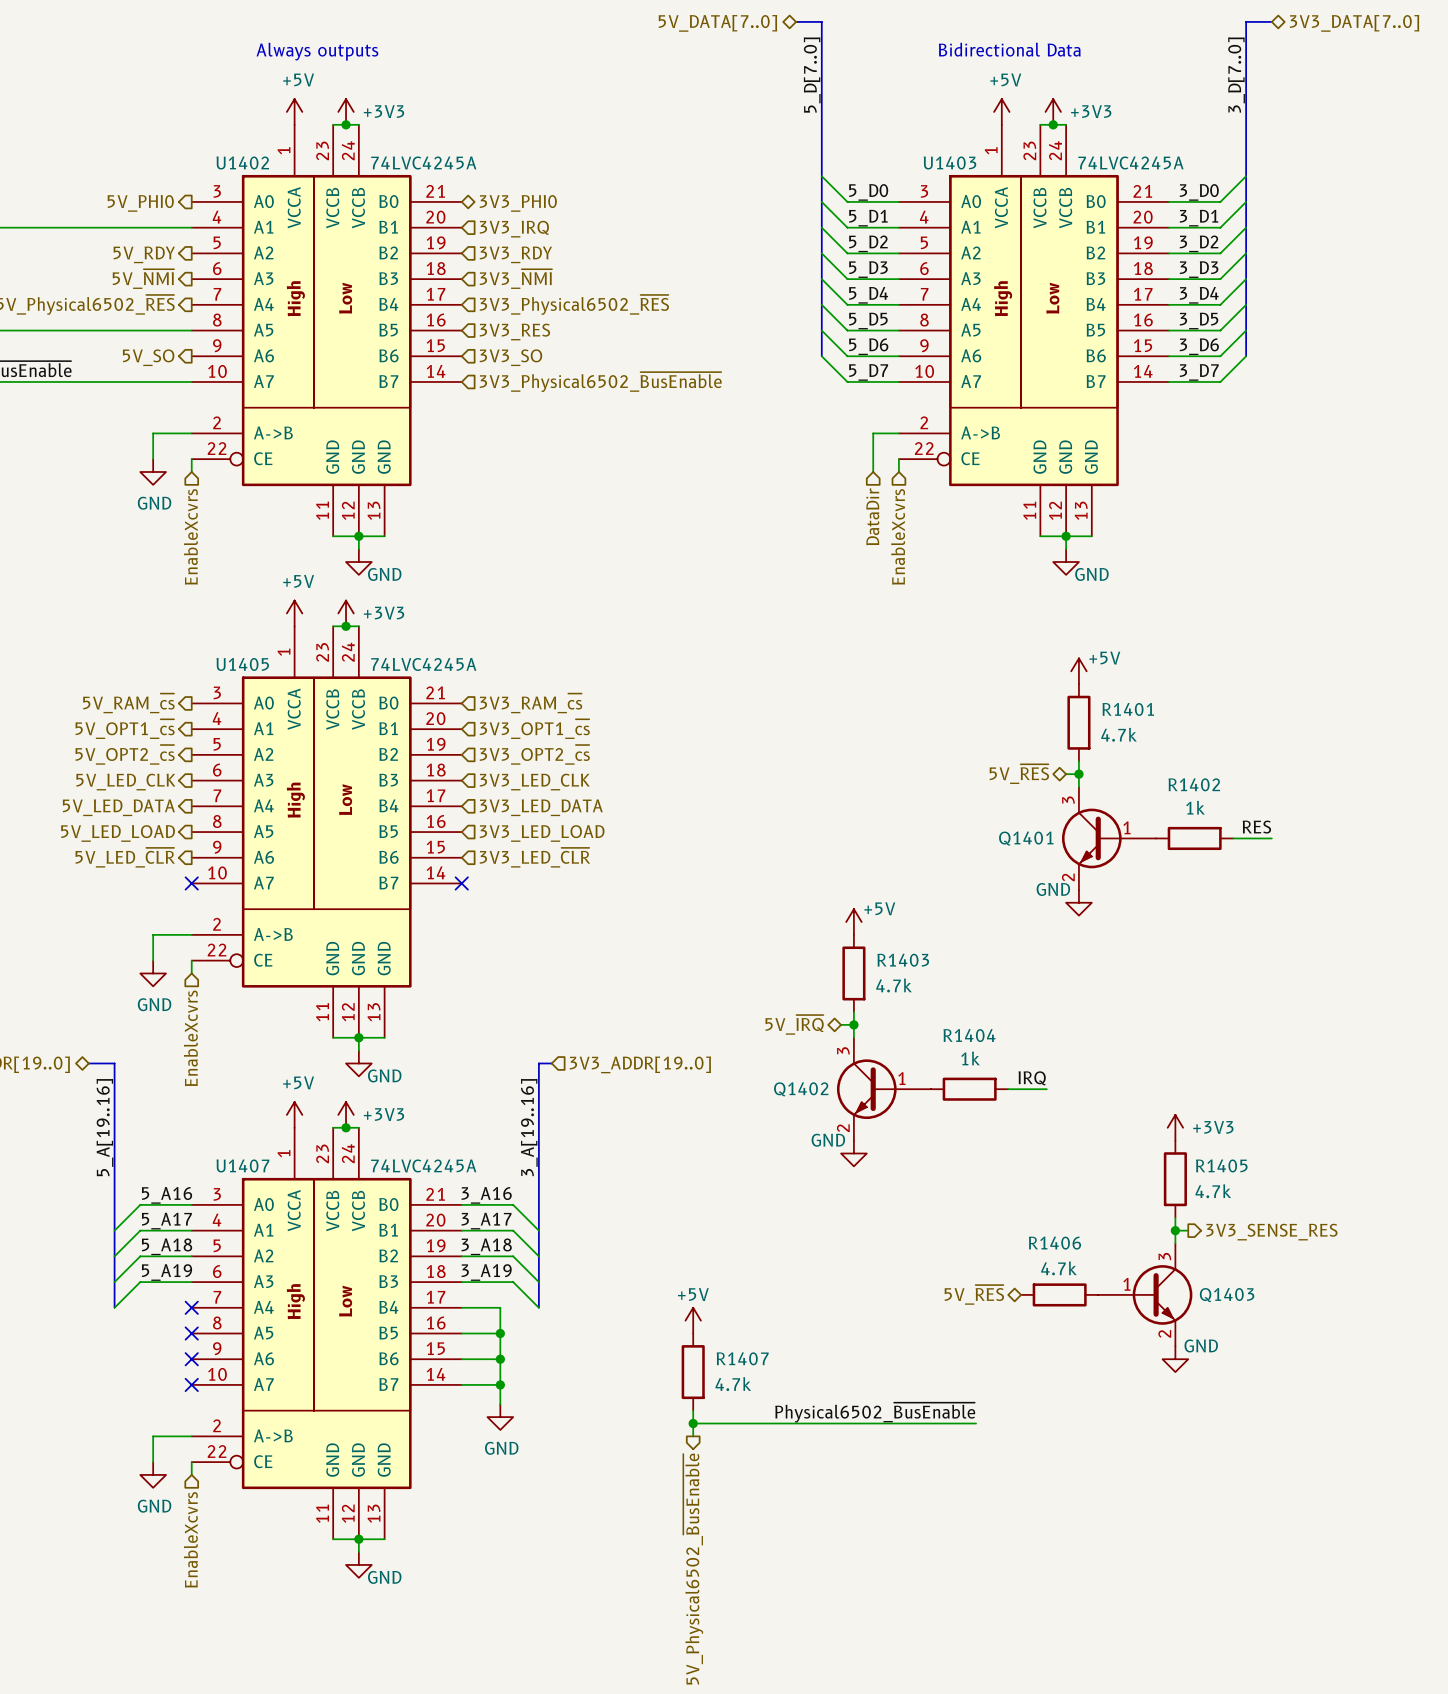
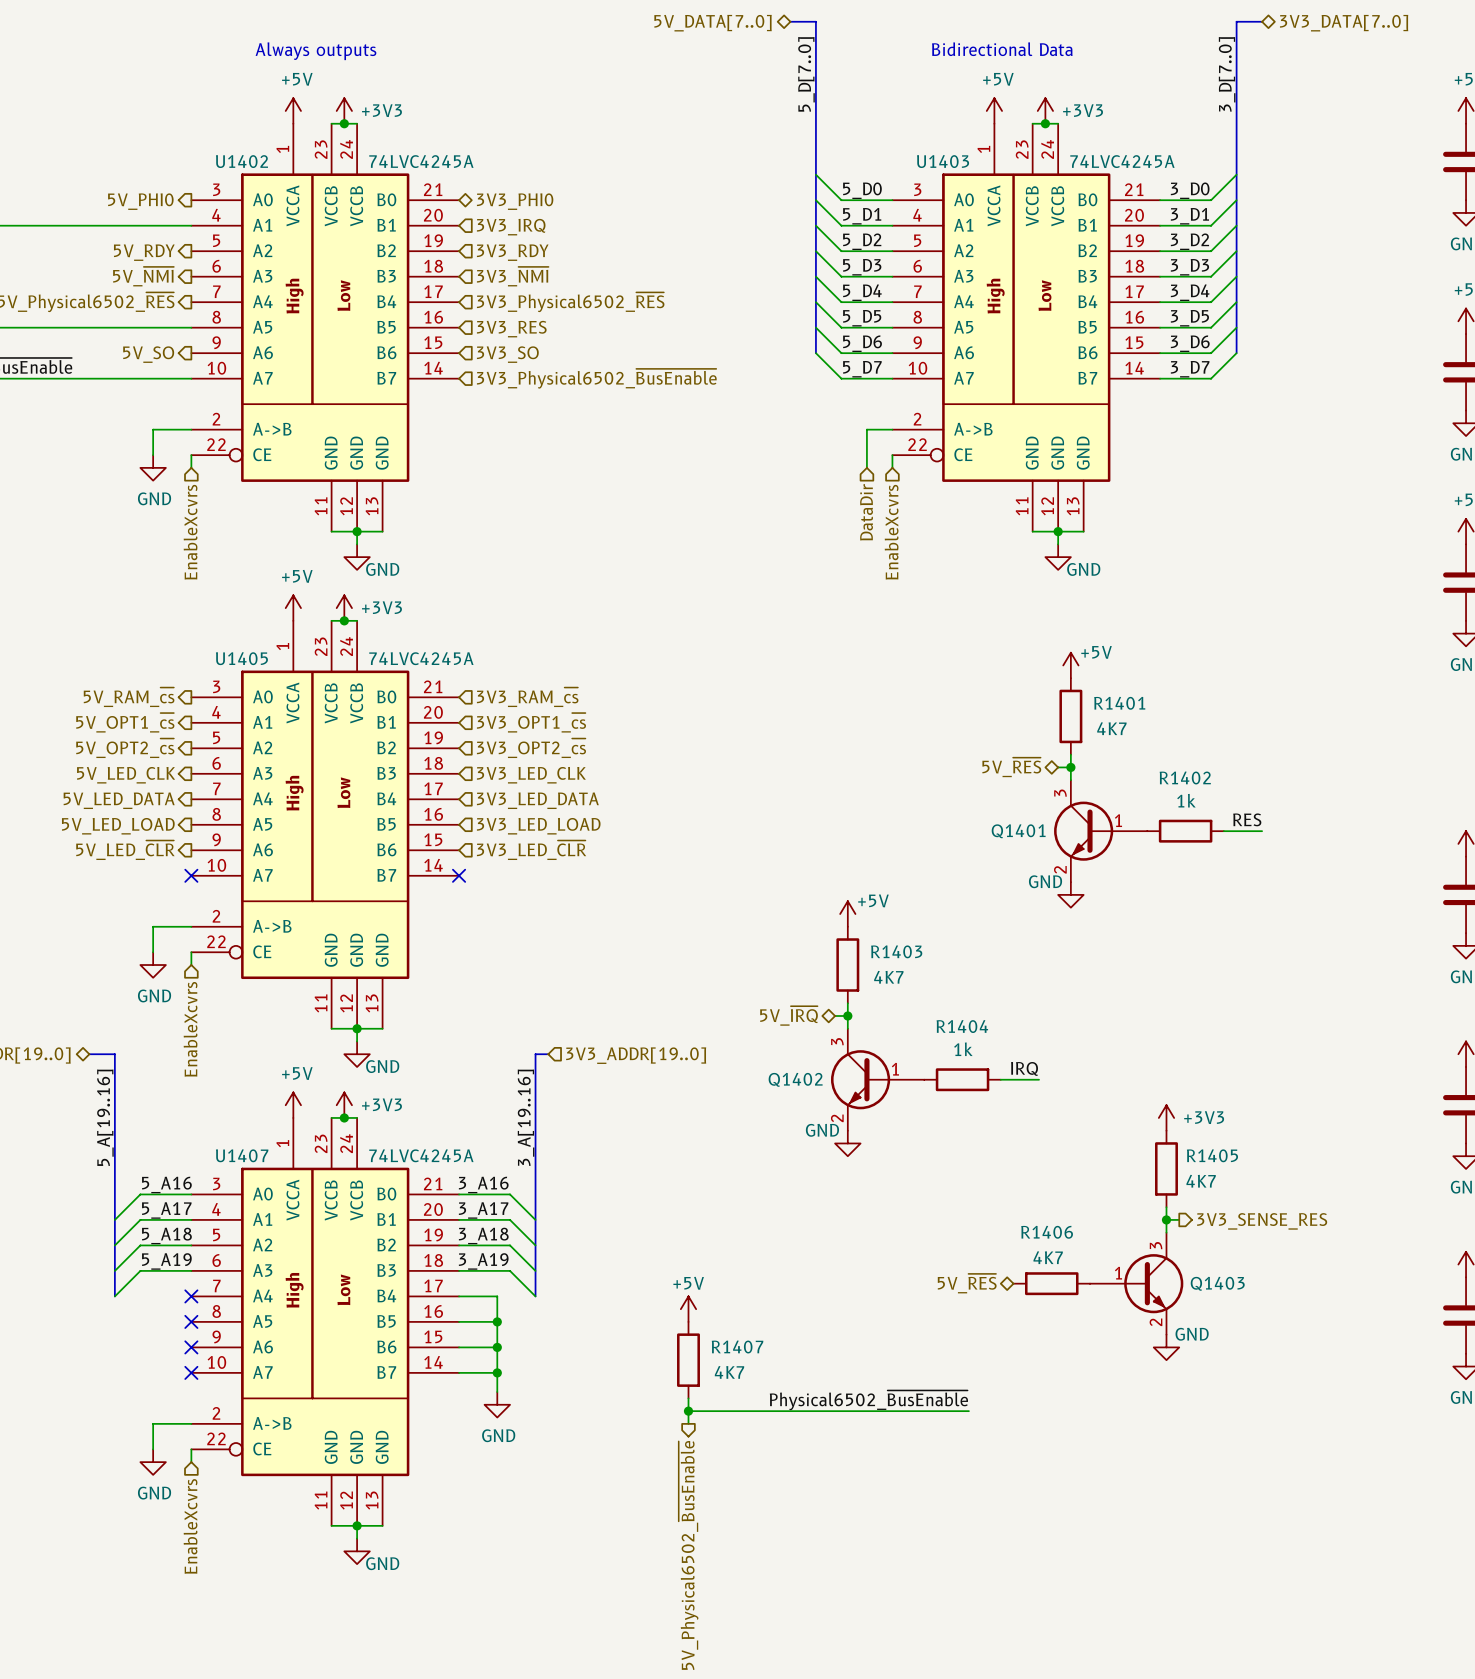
R1401 value: 4.7k (1119, 734) -> 4K7 (1111, 728)
R1403 value: 4.7k (894, 985) -> 4K7 (888, 977)
R1405 value: 4.7k (1213, 1191) -> 4K7 (1201, 1181)
R1406 value: 4.7k (1058, 1268) -> 4K7 (1048, 1257)
R1407 value: 4.7k (733, 1384) -> 4K7 (729, 1372)

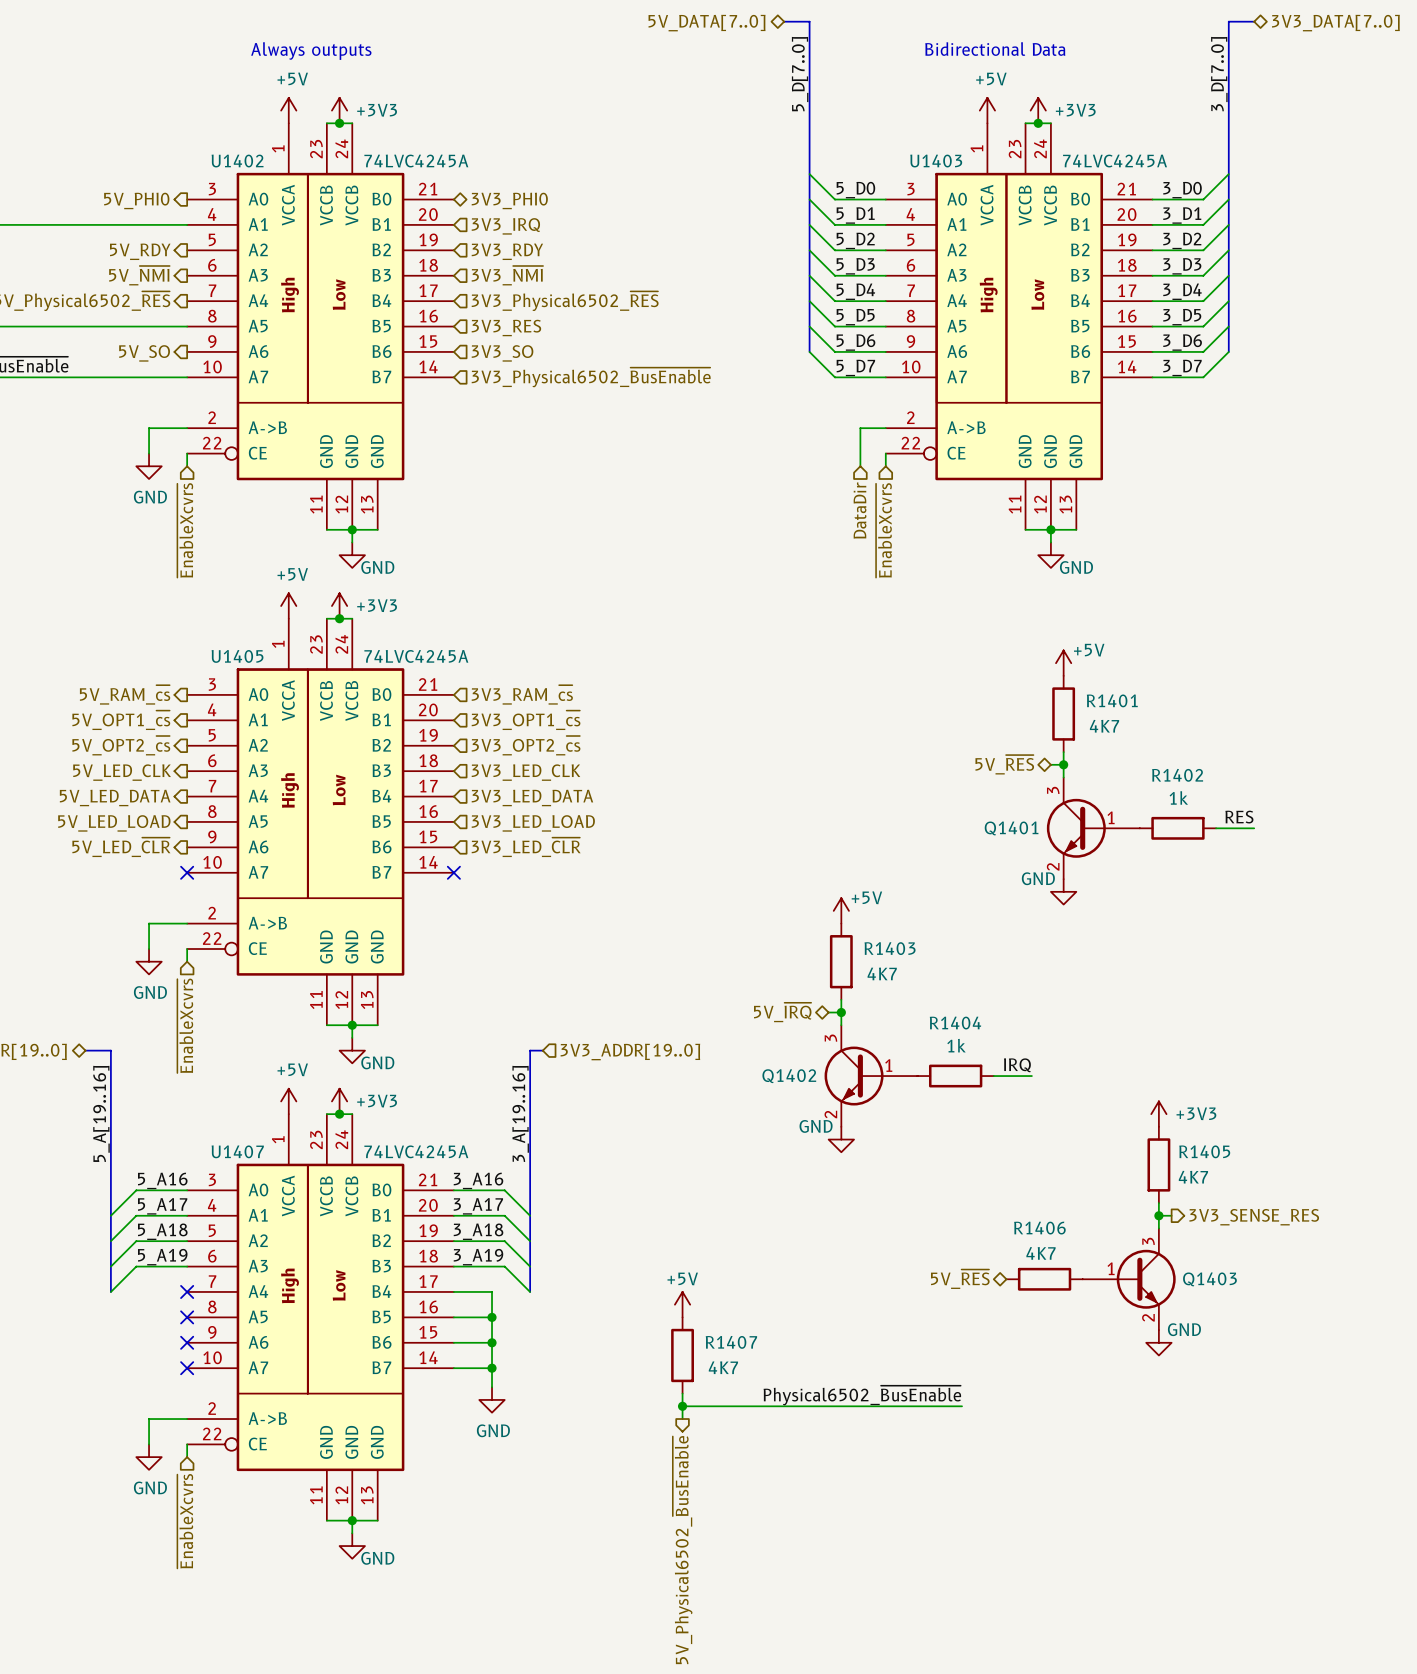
hierarchical label: EnableXcvrs (190, 532) -> ~{EnableXcvrs} (185, 530)
hierarchical label: EnableXcvrs (891, 532) -> ~{EnableXcvrs} (883, 530)
hierarchical label: EnableXcvrs (190, 1029) -> ~{EnableXcvrs} (185, 1025)
hierarchical label: EnableXcvrs (190, 1526) -> ~{EnableXcvrs} (185, 1521)

